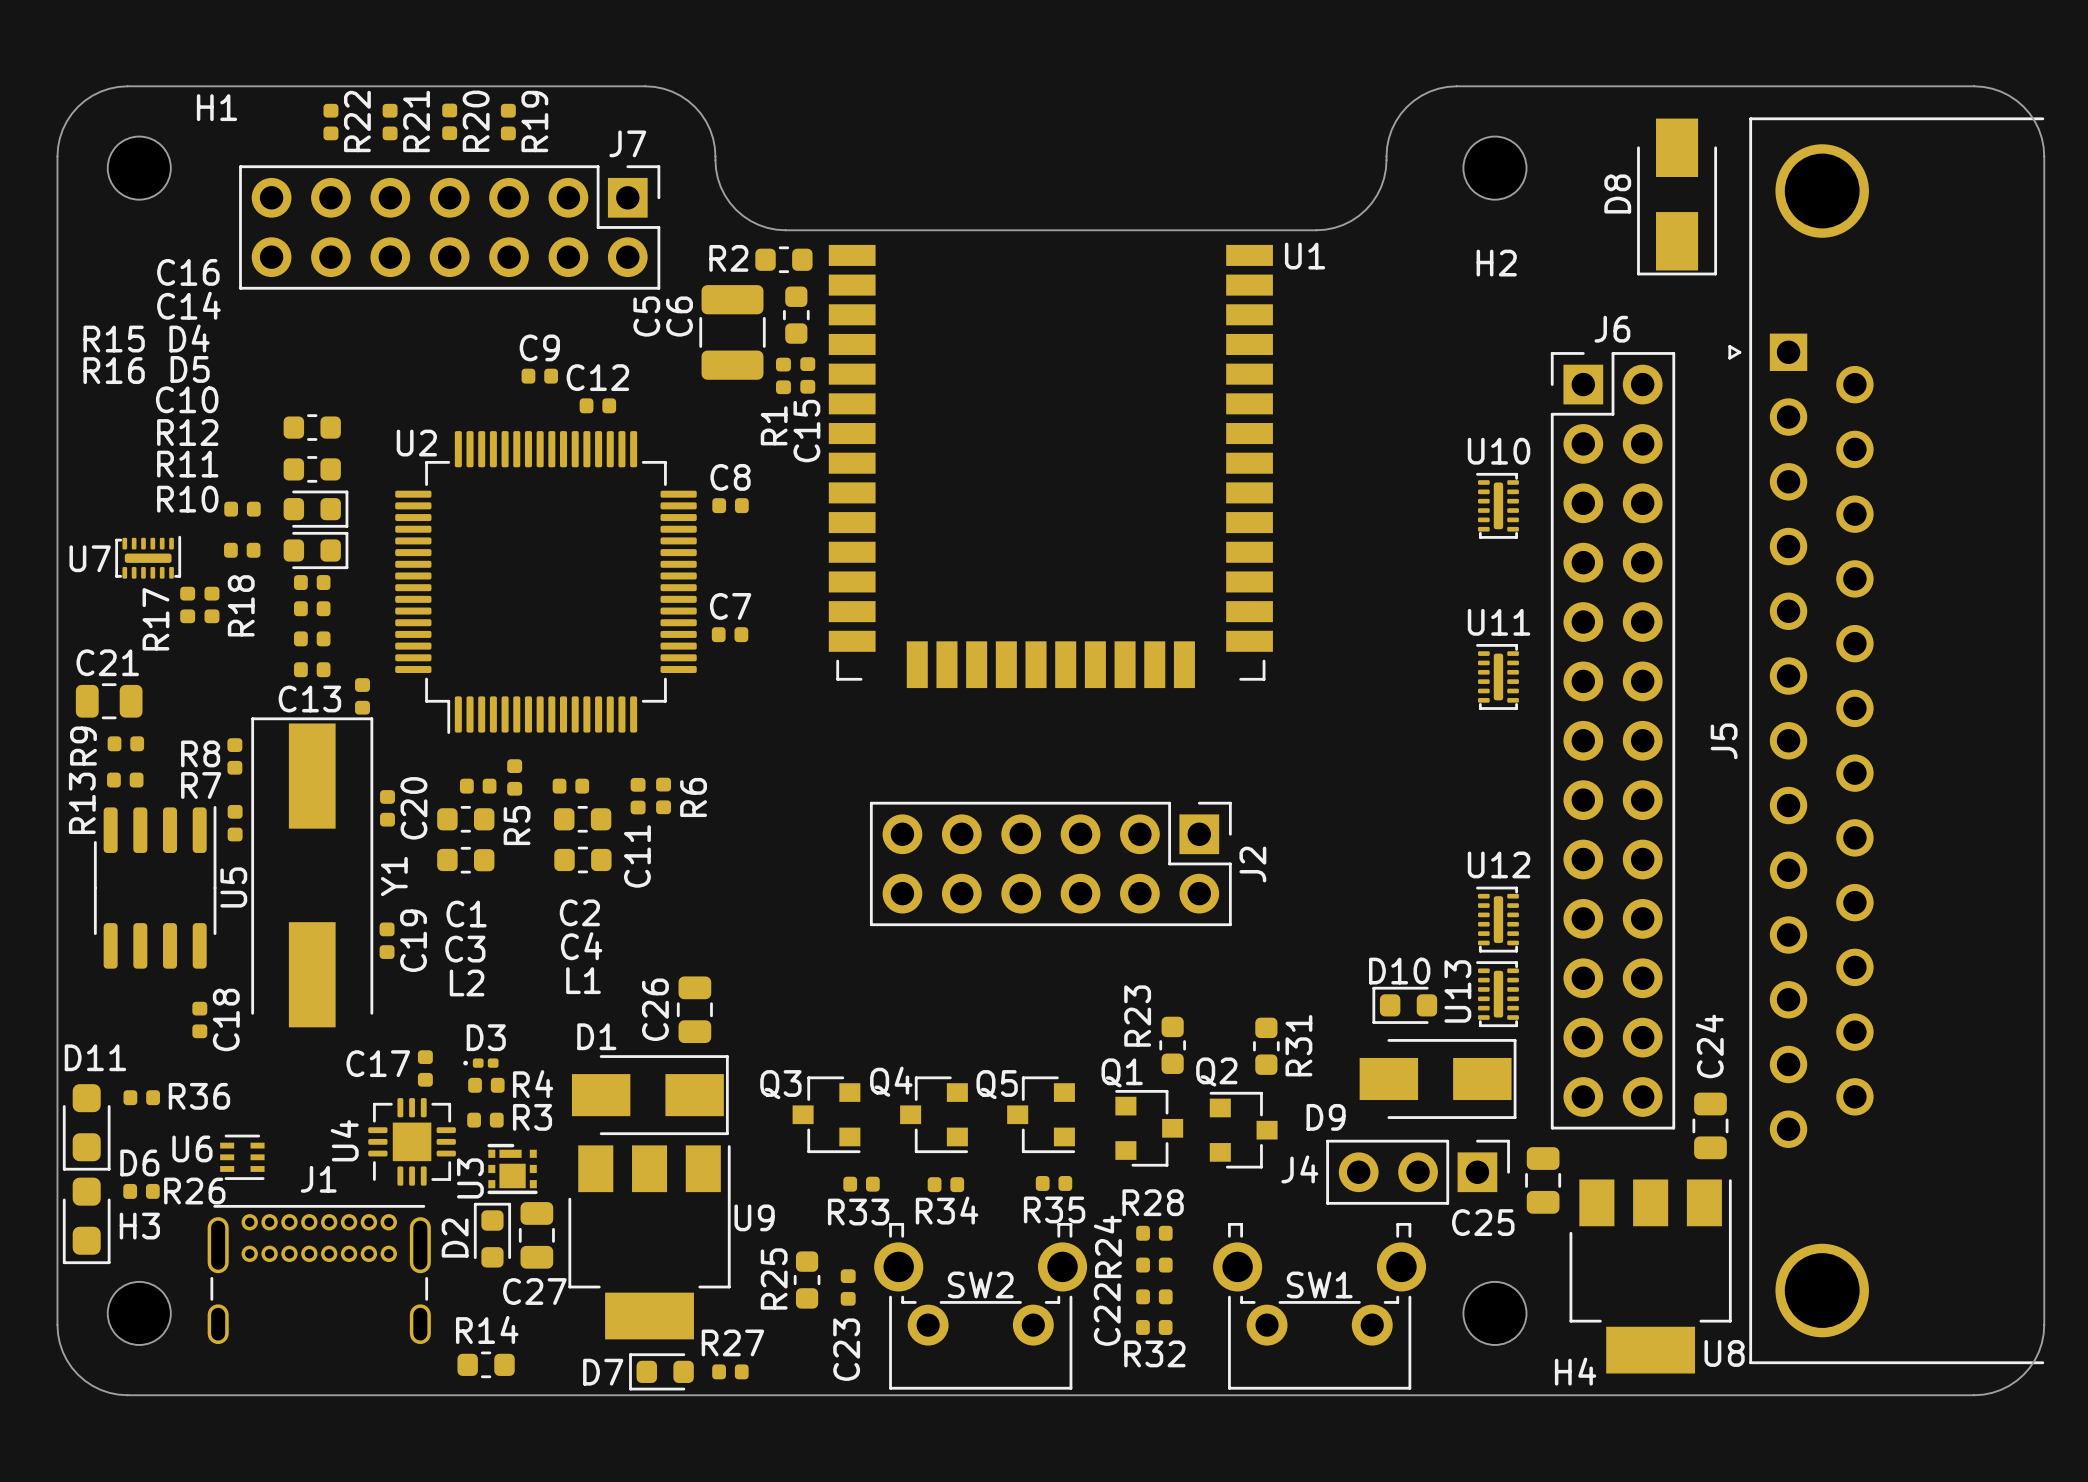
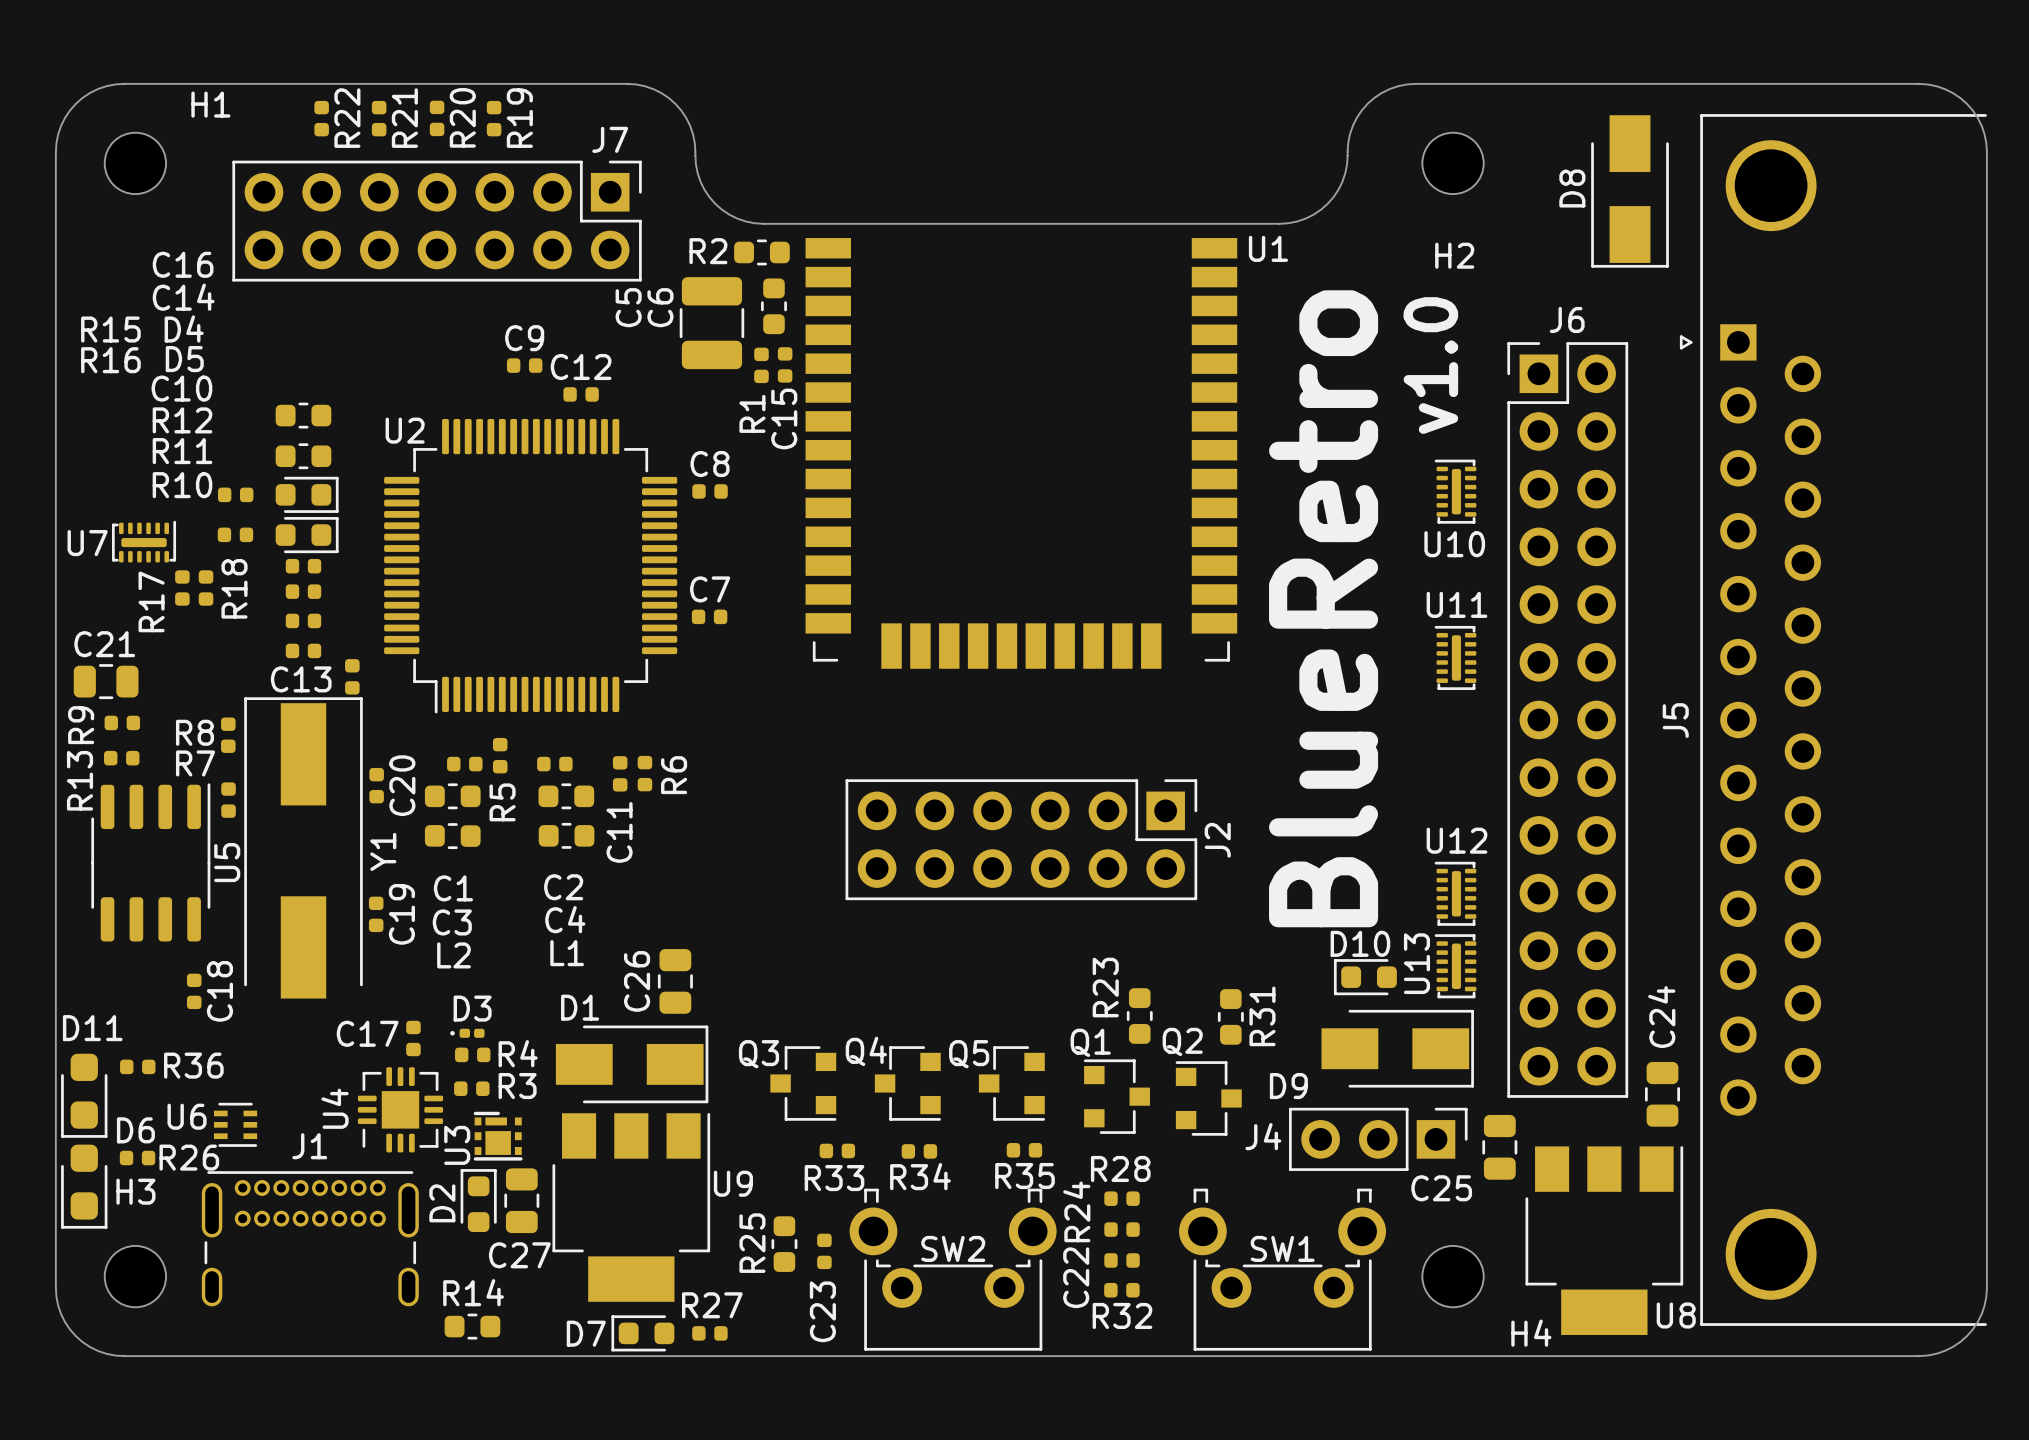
text: none -> v1.0 (1430, 365)
U10 name position: U10 (1499, 451) -> U10 (1454, 544)
text: none -> BlueRetro (1323, 608)

